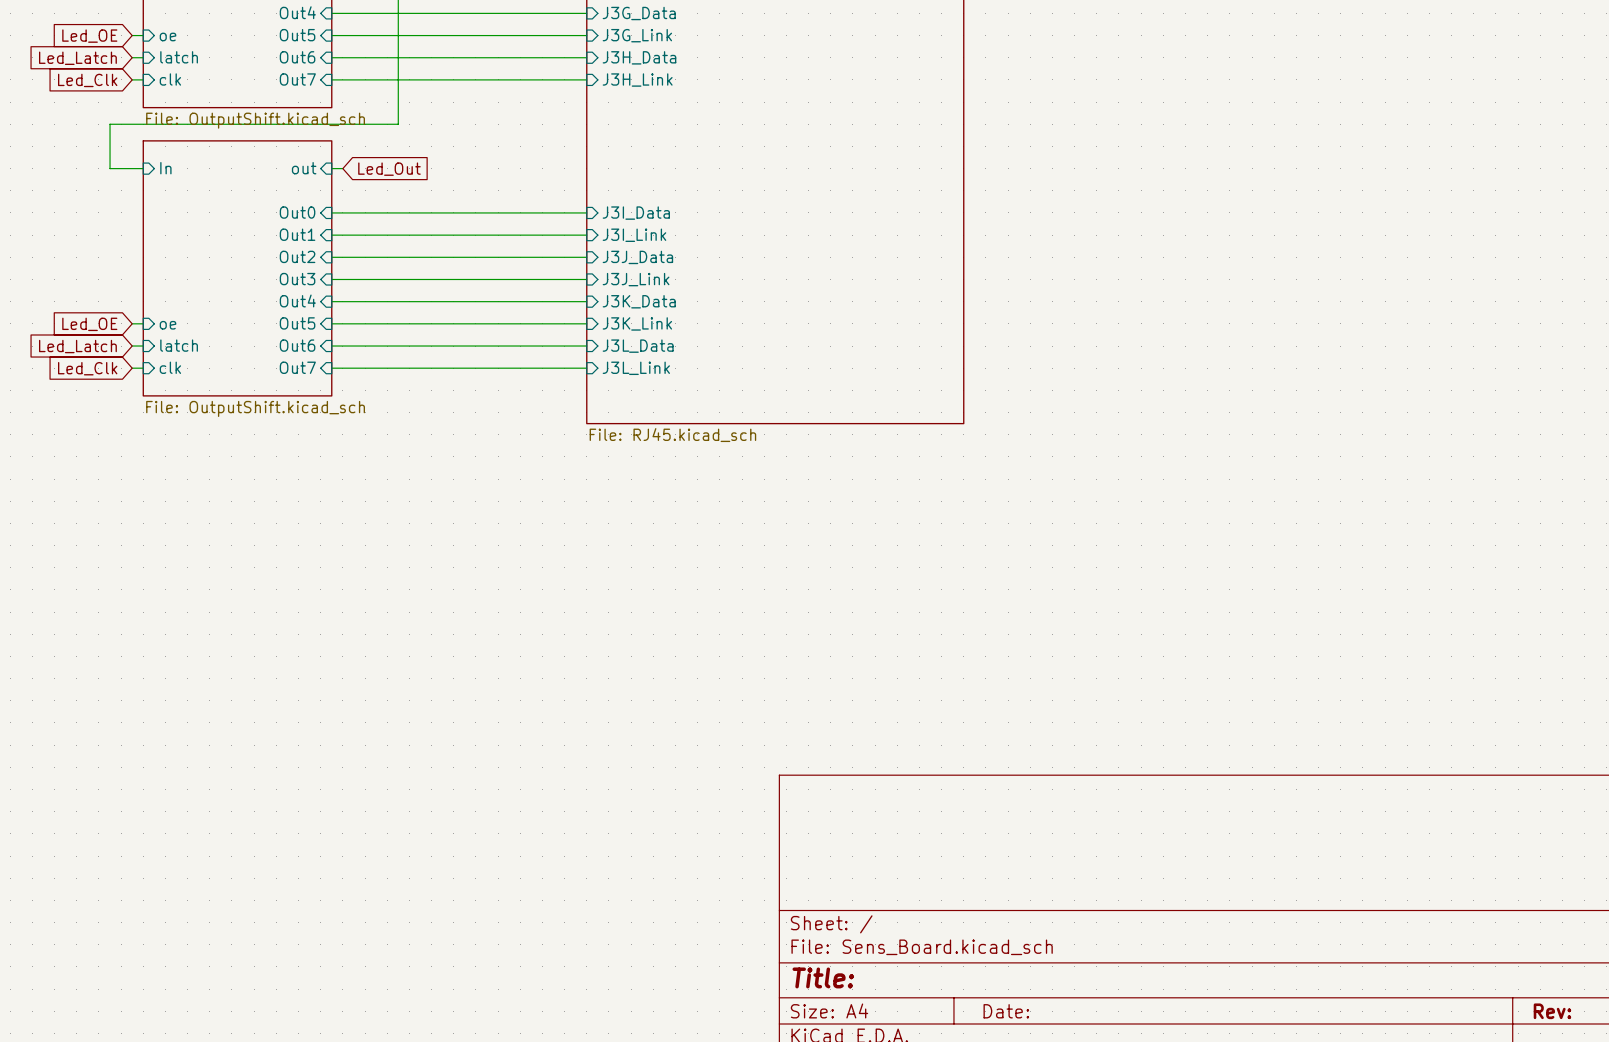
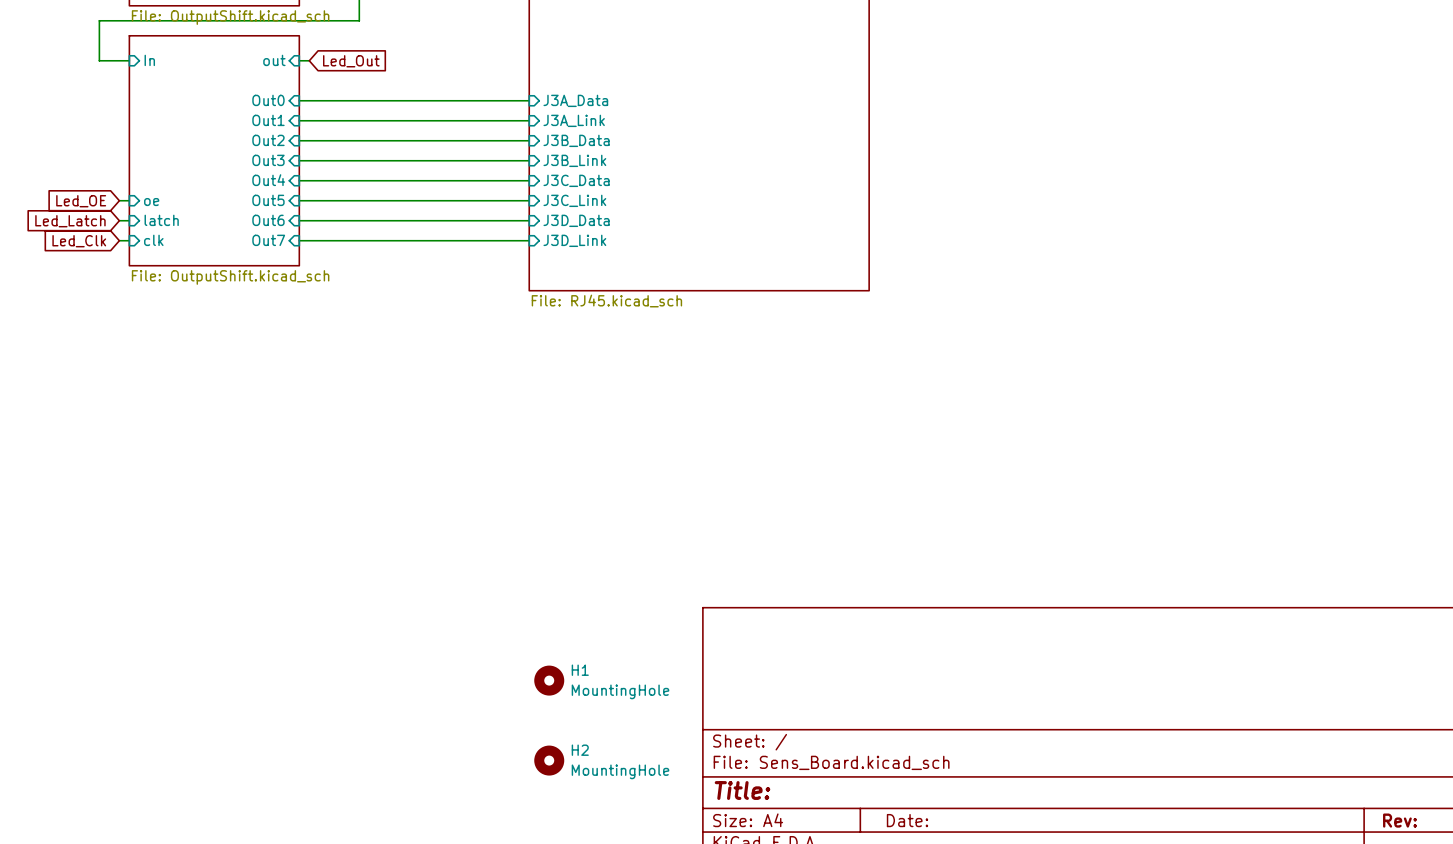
sheet pin: J3I_Data (636, 213) -> J3A_Data (575, 100)
sheet pin: J3I_Link (634, 235) -> J3A_Link (574, 120)
sheet pin: J3J_Data (637, 257) -> J3B_Data (576, 140)
sheet pin: J3J_Link (636, 279) -> J3B_Link (574, 160)
sheet pin: J3K_Data (639, 301) -> J3C_Data (576, 180)
sheet pin: J3K_Link (637, 323) -> J3C_Link (574, 200)
sheet pin: J3L_Data (638, 346) -> J3D_Data (576, 220)
sheet pin: J3L_Link (636, 368) -> J3D_Link (574, 240)
H1: none -> MountingHole (549, 680)
H2: none -> MountingHole (549, 760)

